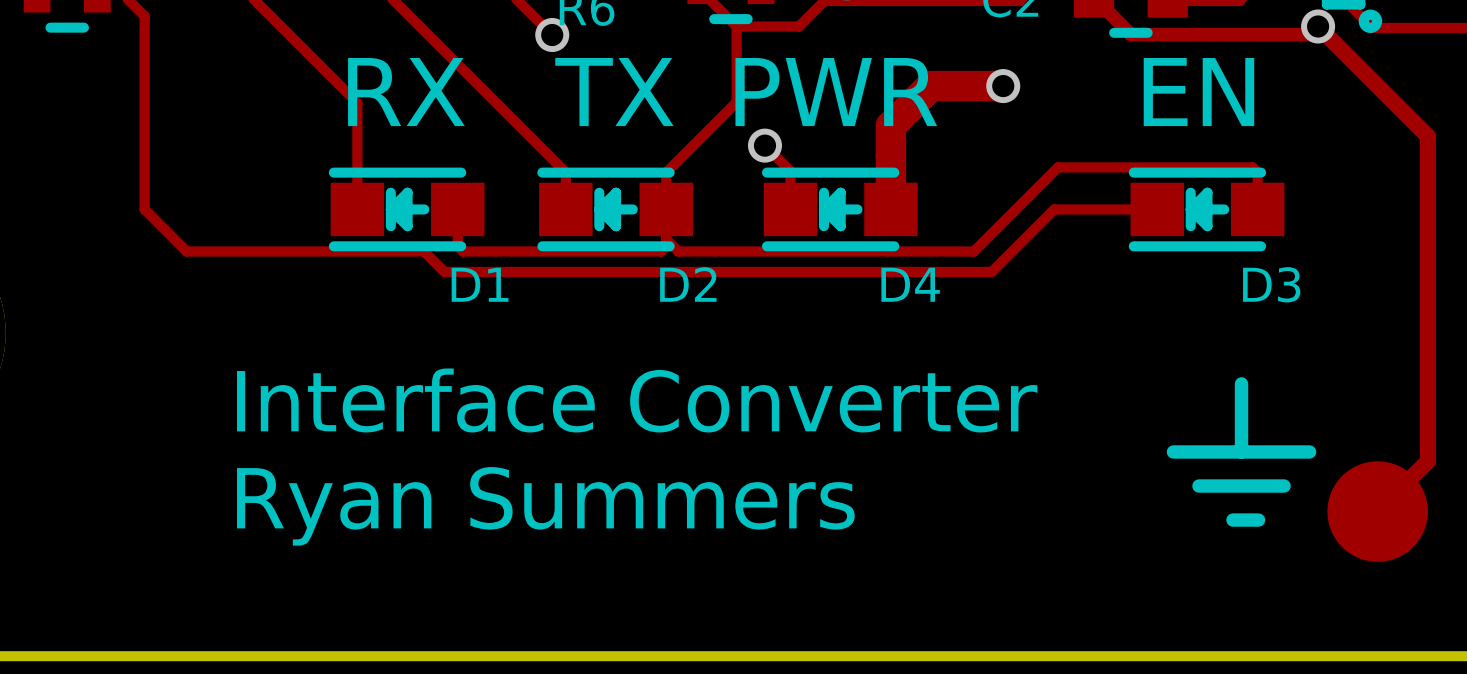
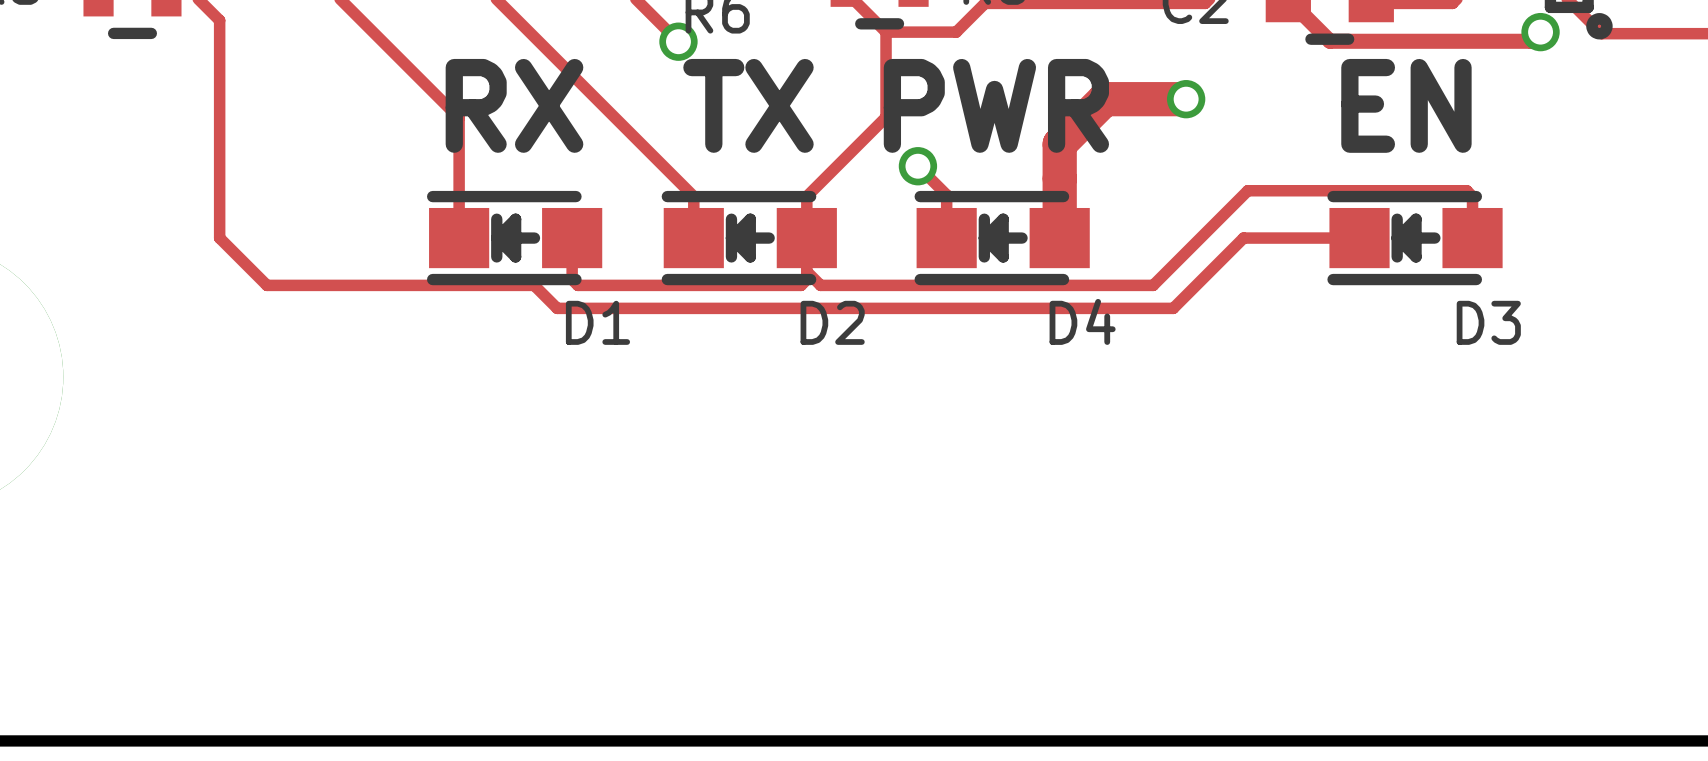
track: (1318, 26) (1427, 136) (1427, 461) (1377, 511) -> none
line: (1241, 383) (1241, 451) -> none
text: Interface Converter (637, 400) -> none
line: (1173, 451) (1309, 451) -> none
line: (1198, 486) (1284, 486) -> none
text: Ryan Summers (545, 506) -> none
part: (1377, 511) -> none
line: (1233, 520) (1258, 520) -> none

